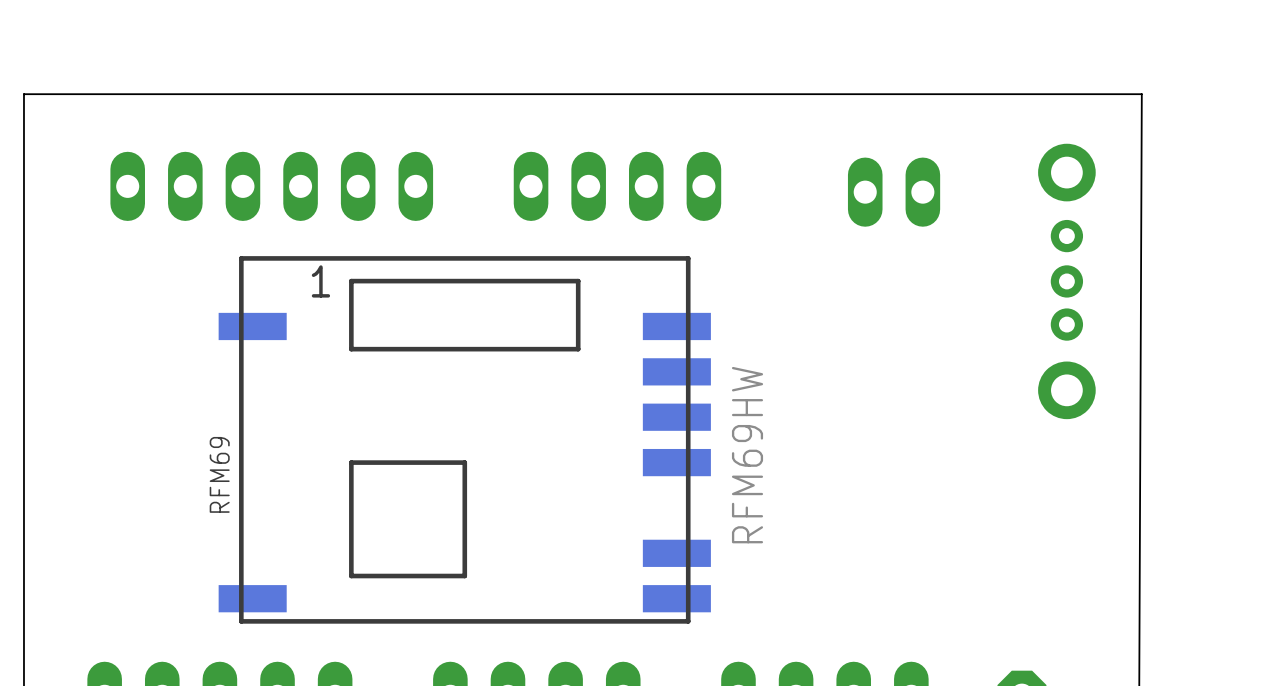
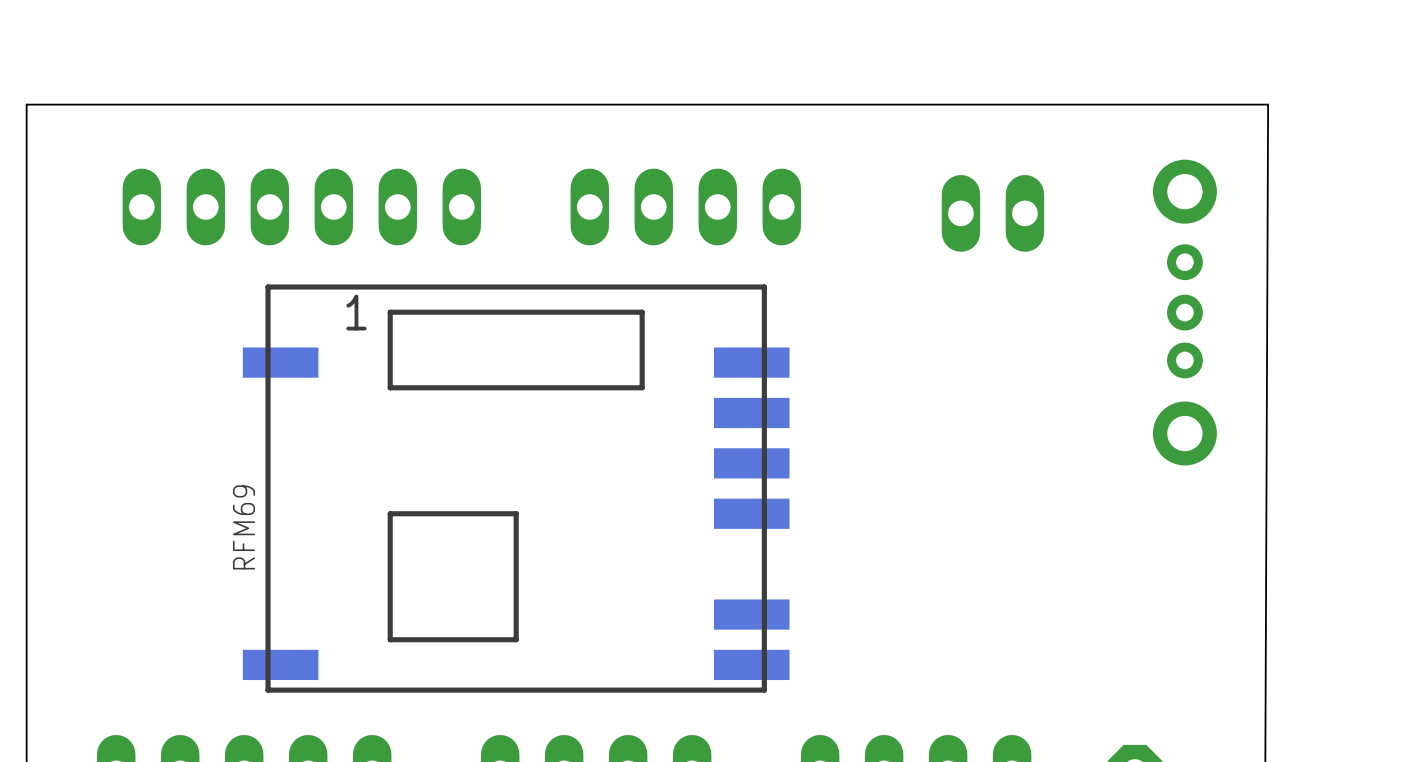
RFM69 value: RFM69HW (747, 455) -> none

